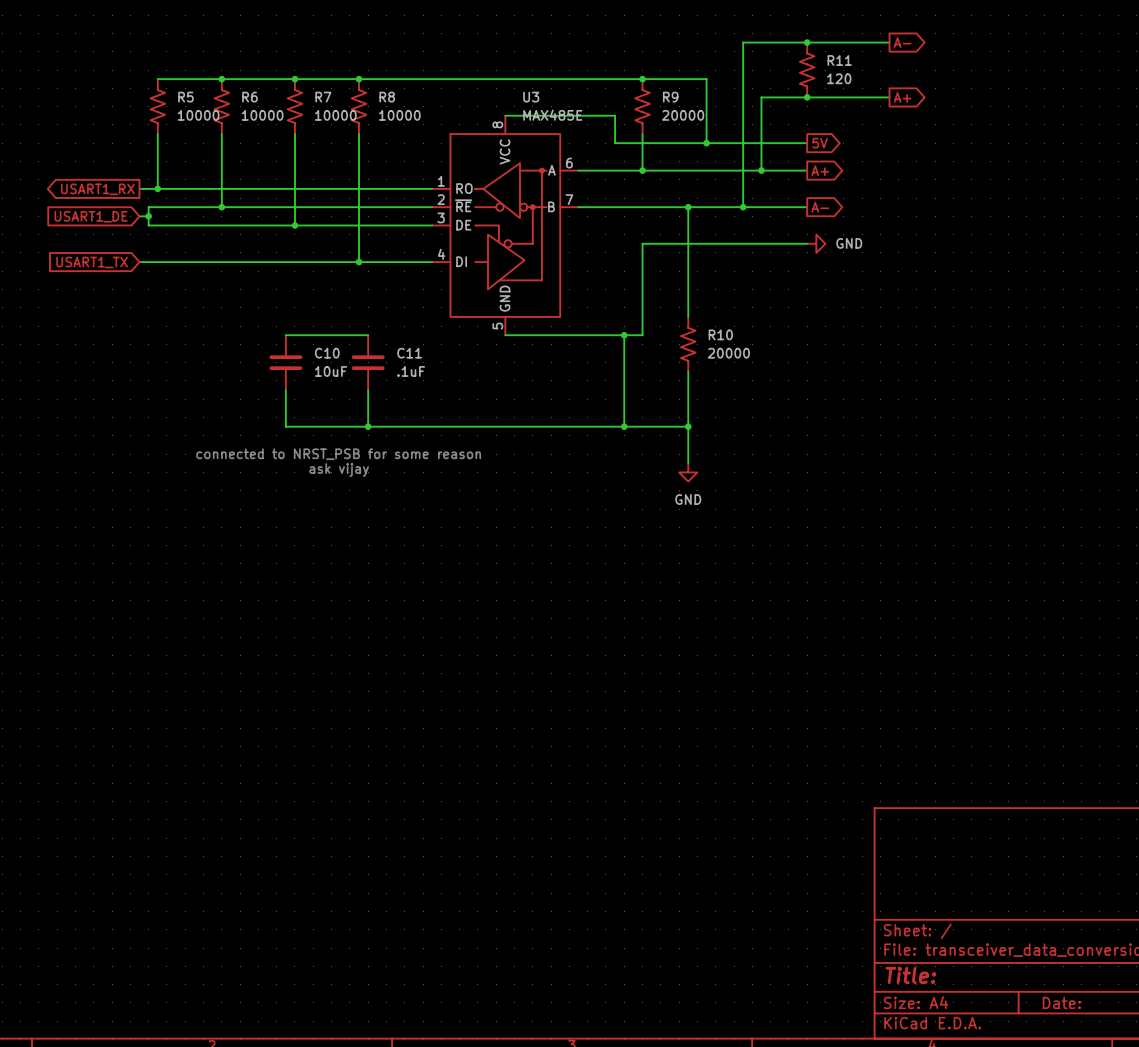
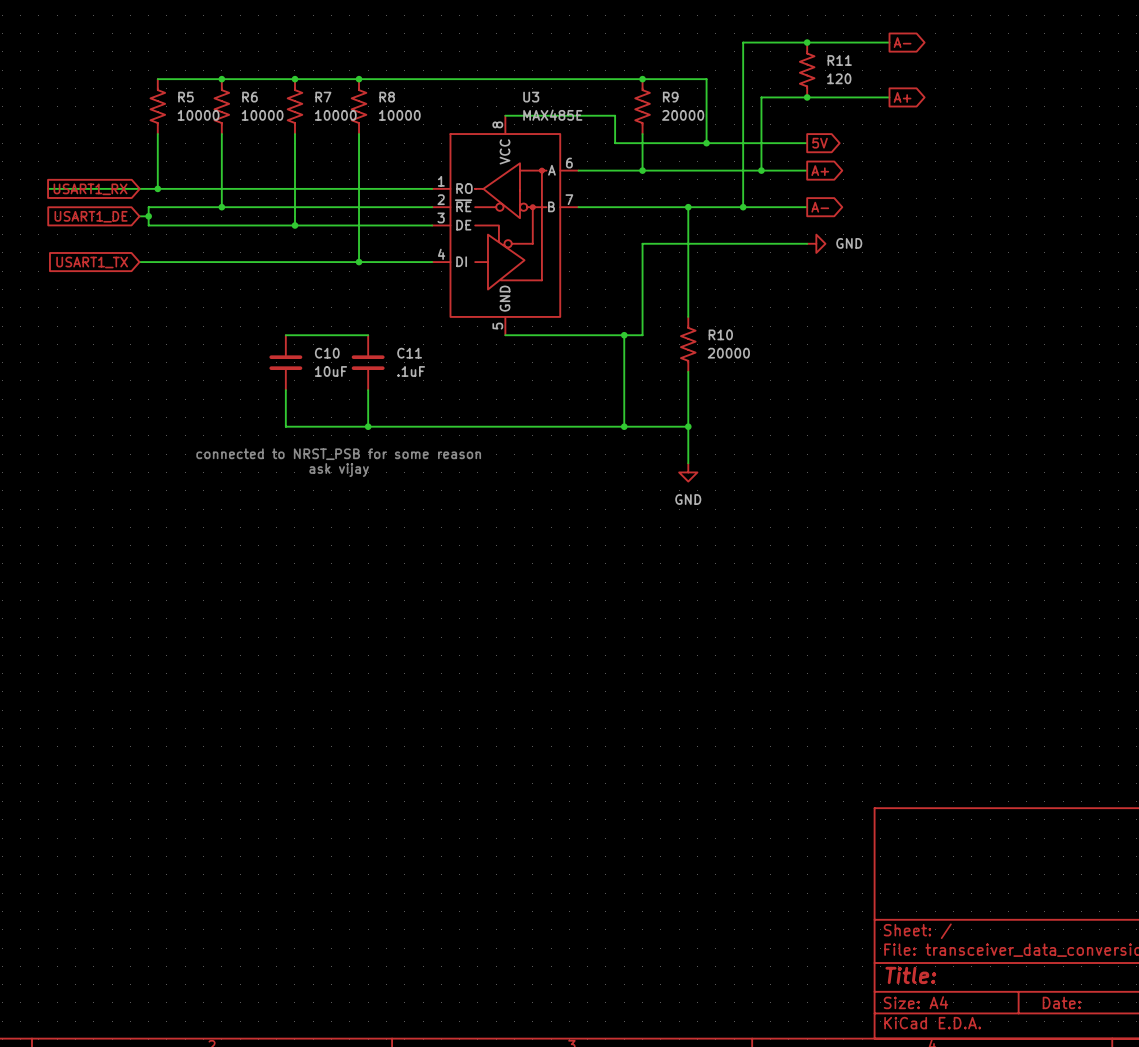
wire: none -> (48, 188) (139, 188)
global label rotation: 0° (97, 189) -> 180° (90, 189)

